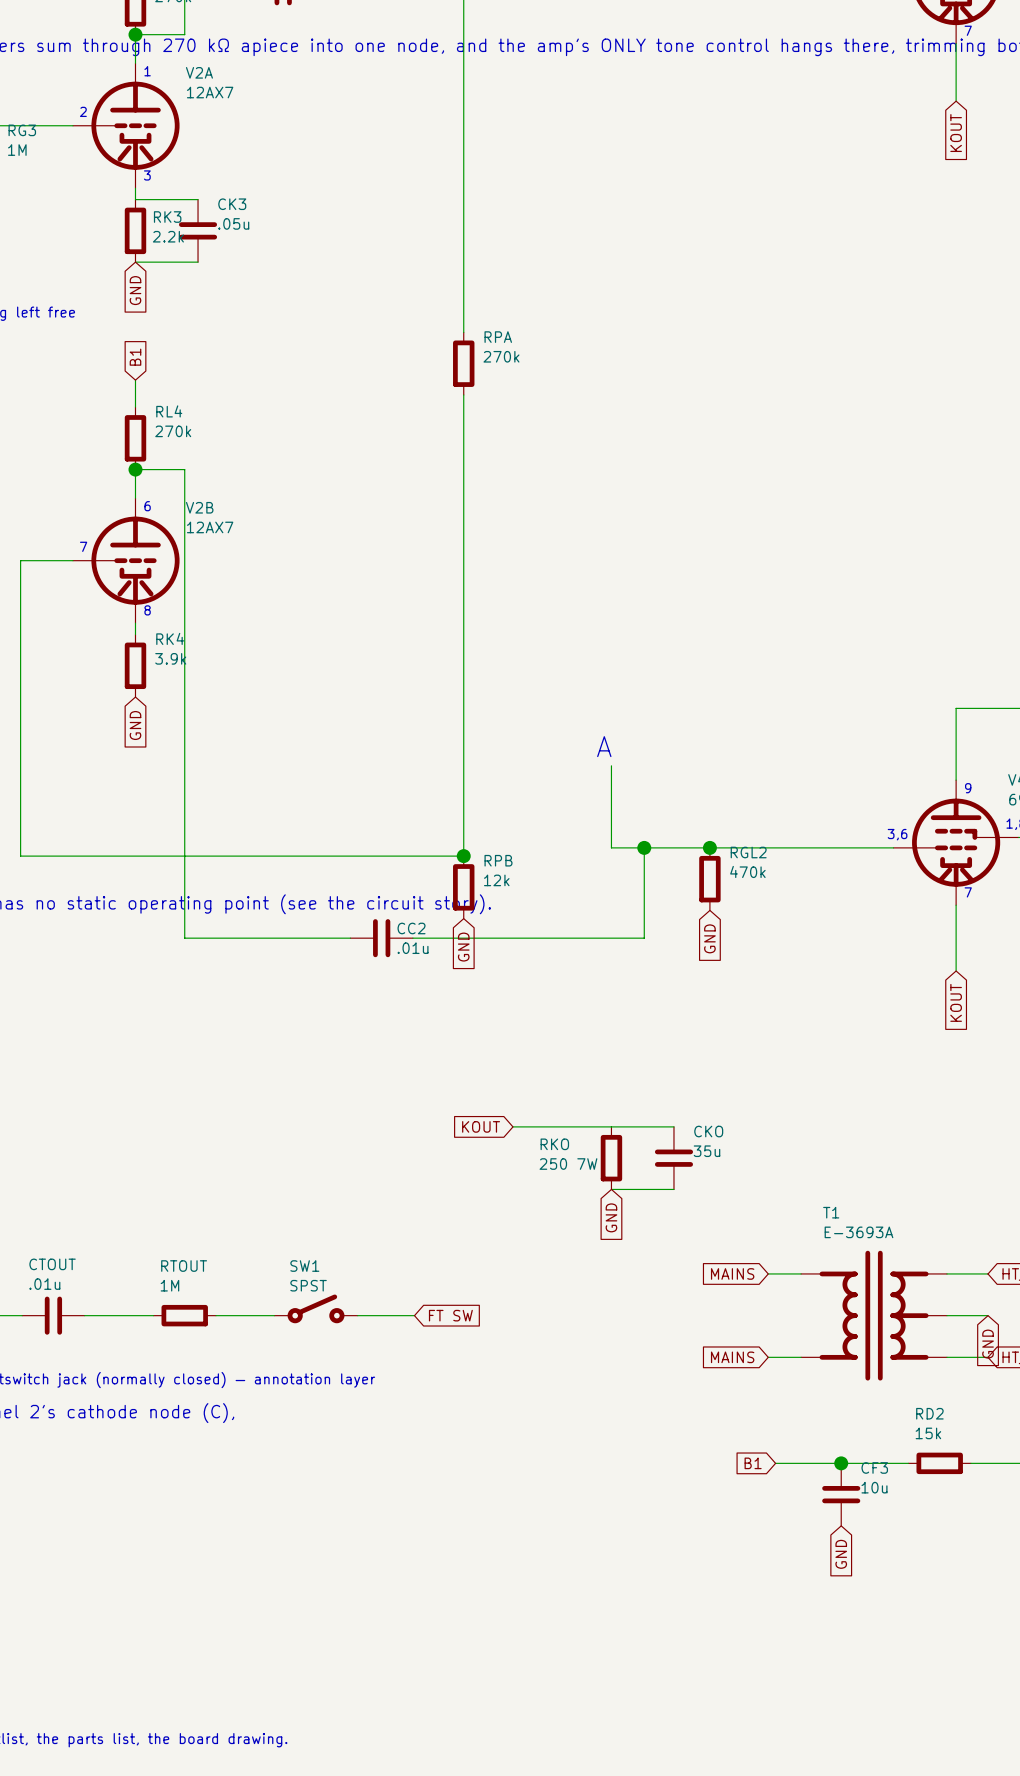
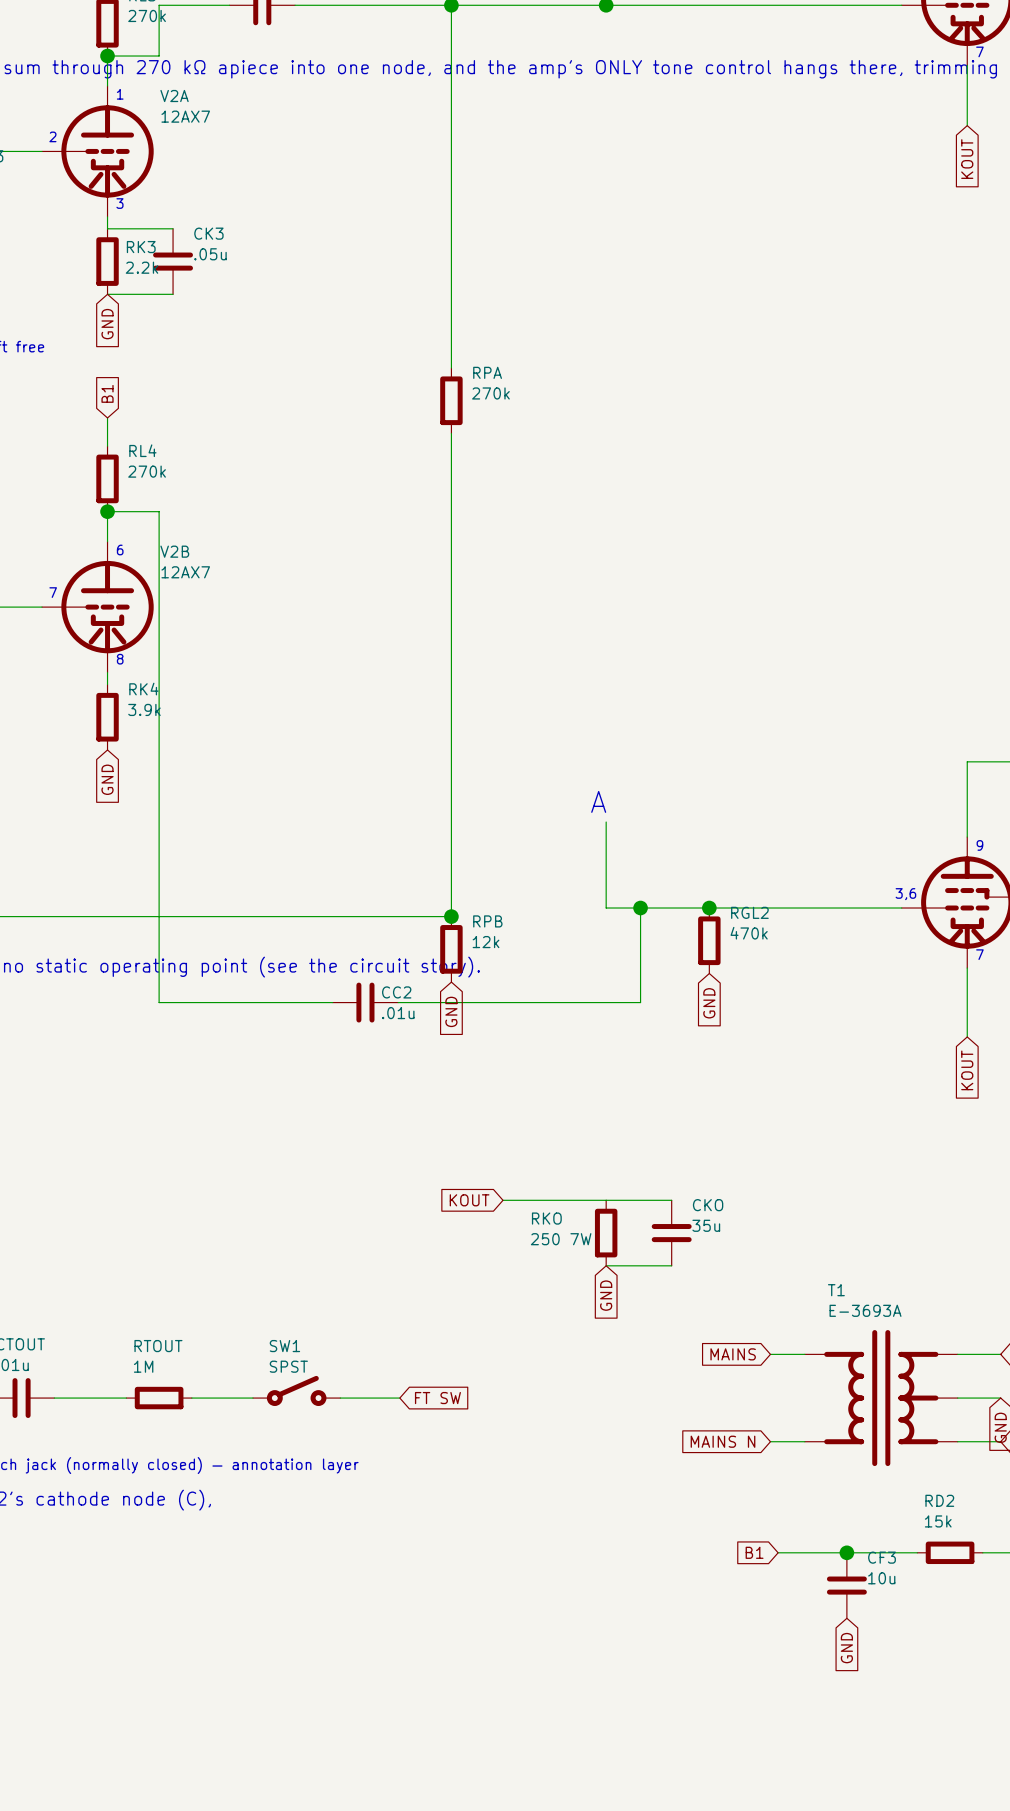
global label: MAINS (732, 1357) -> MAINS N (723, 1441)

